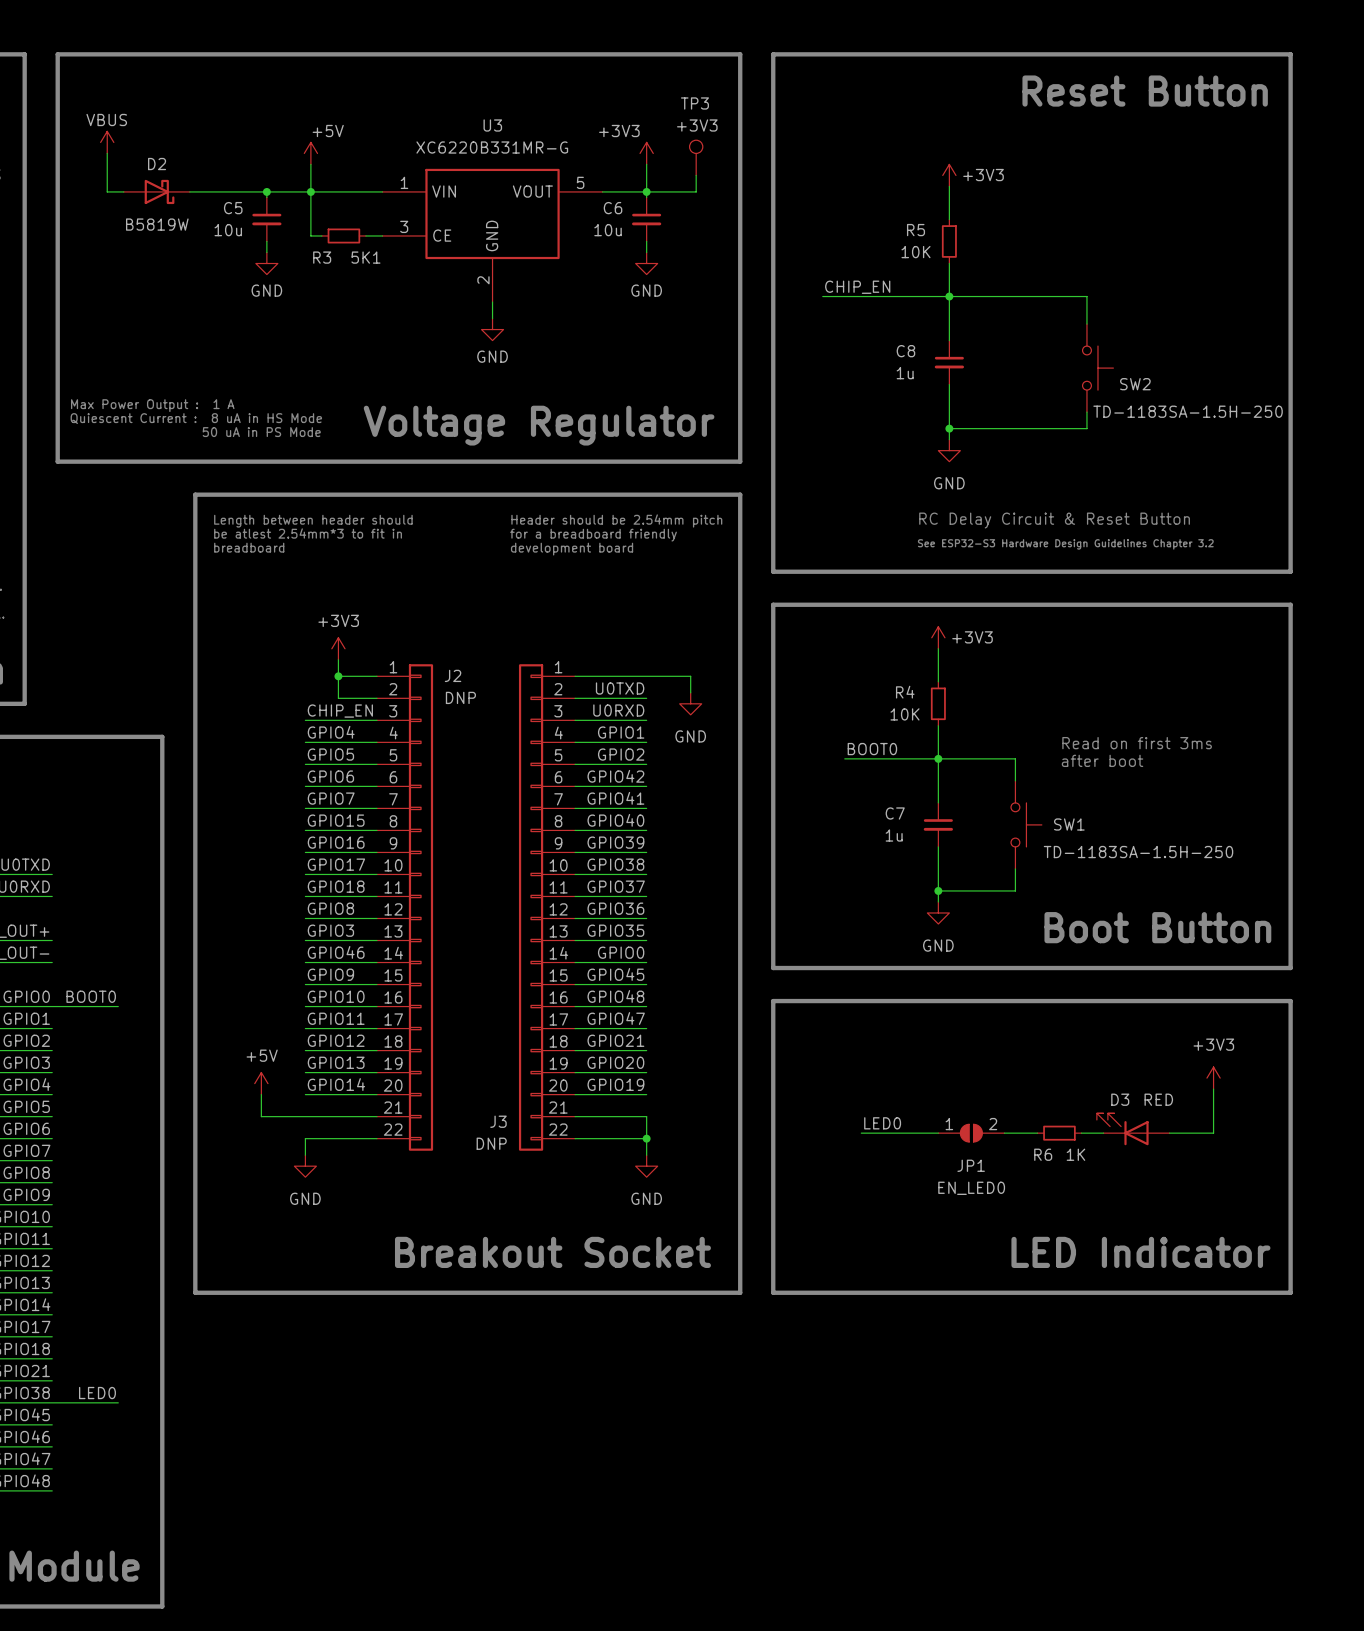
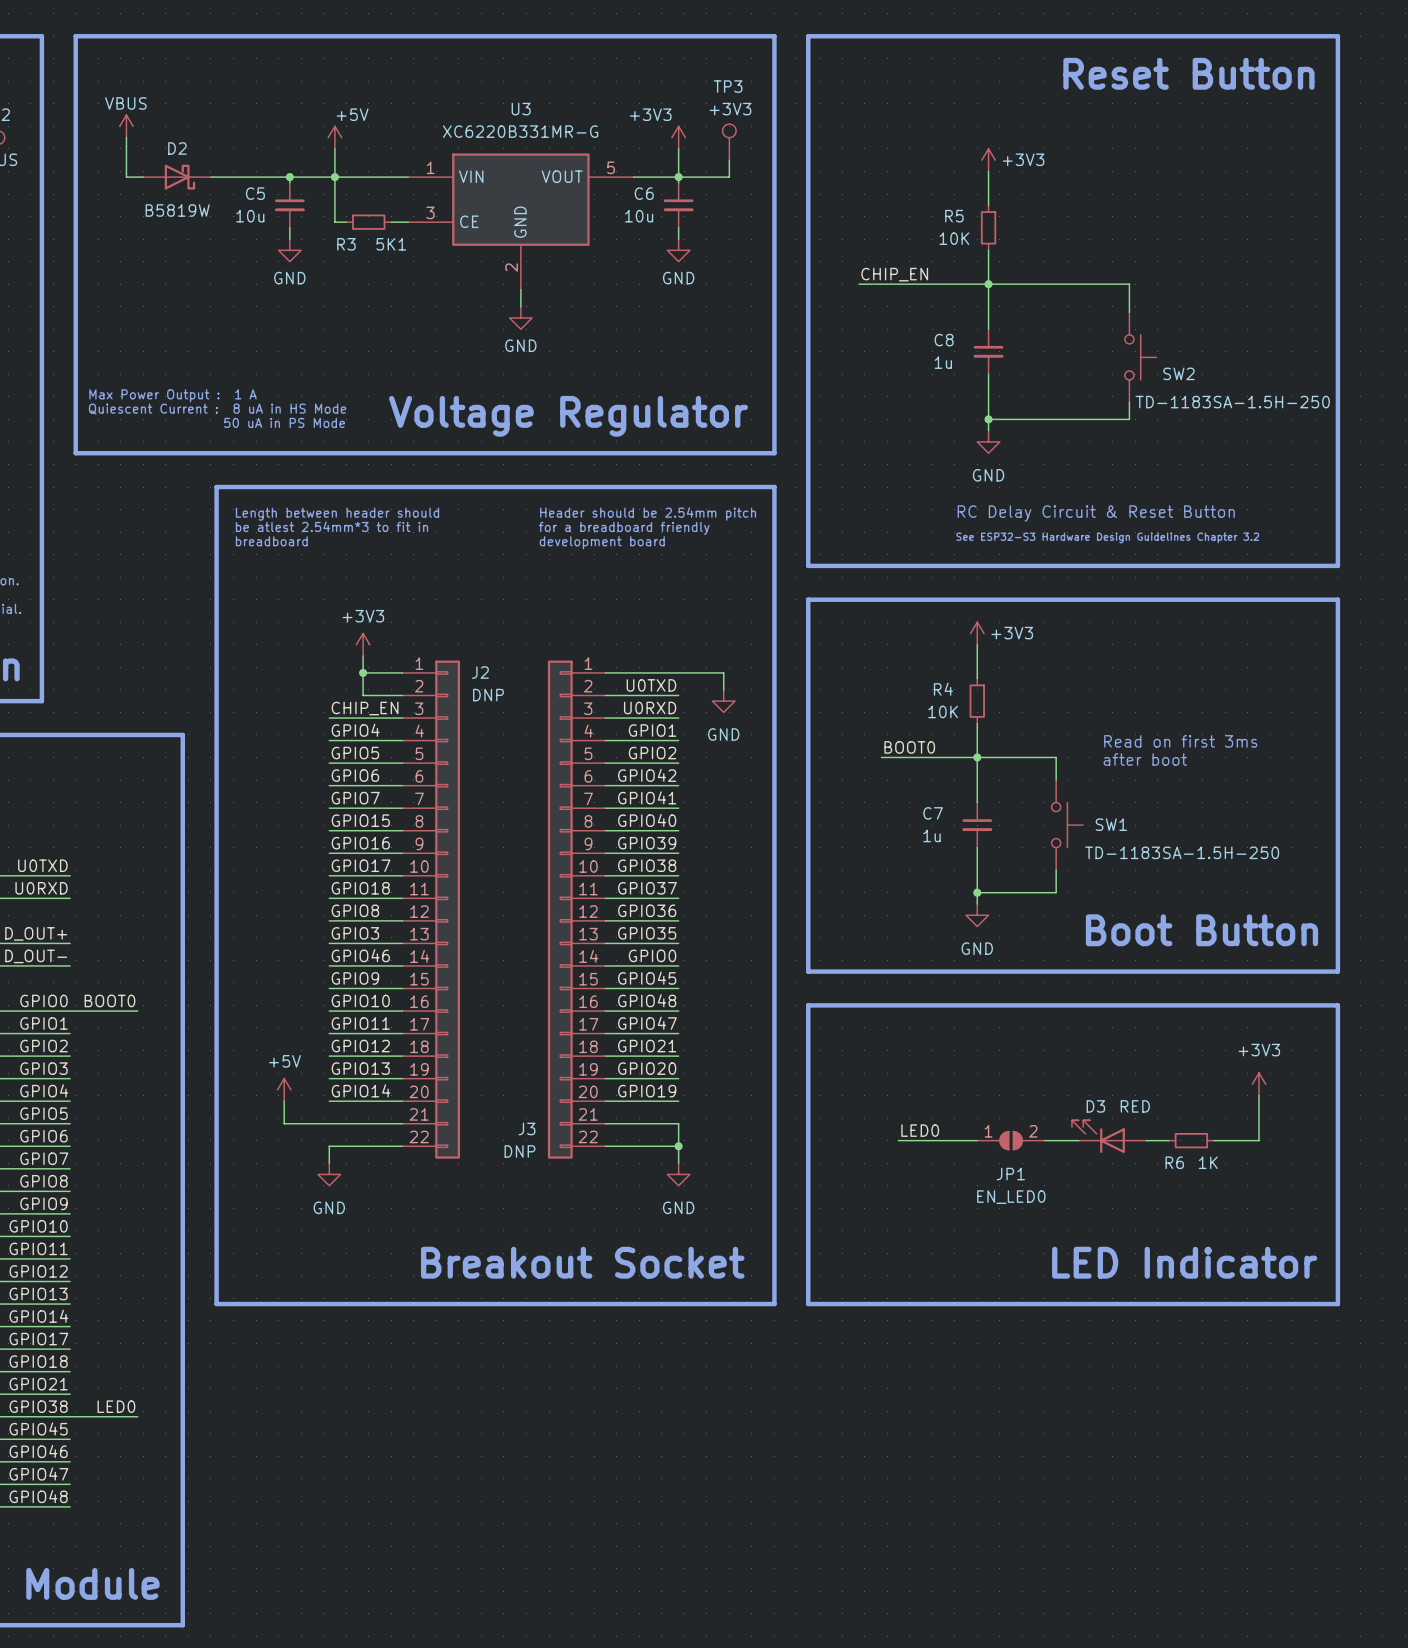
D3 position: (1133, 1129) -> (1109, 1136)
R6 position: (1059, 1133) -> (1191, 1140)

